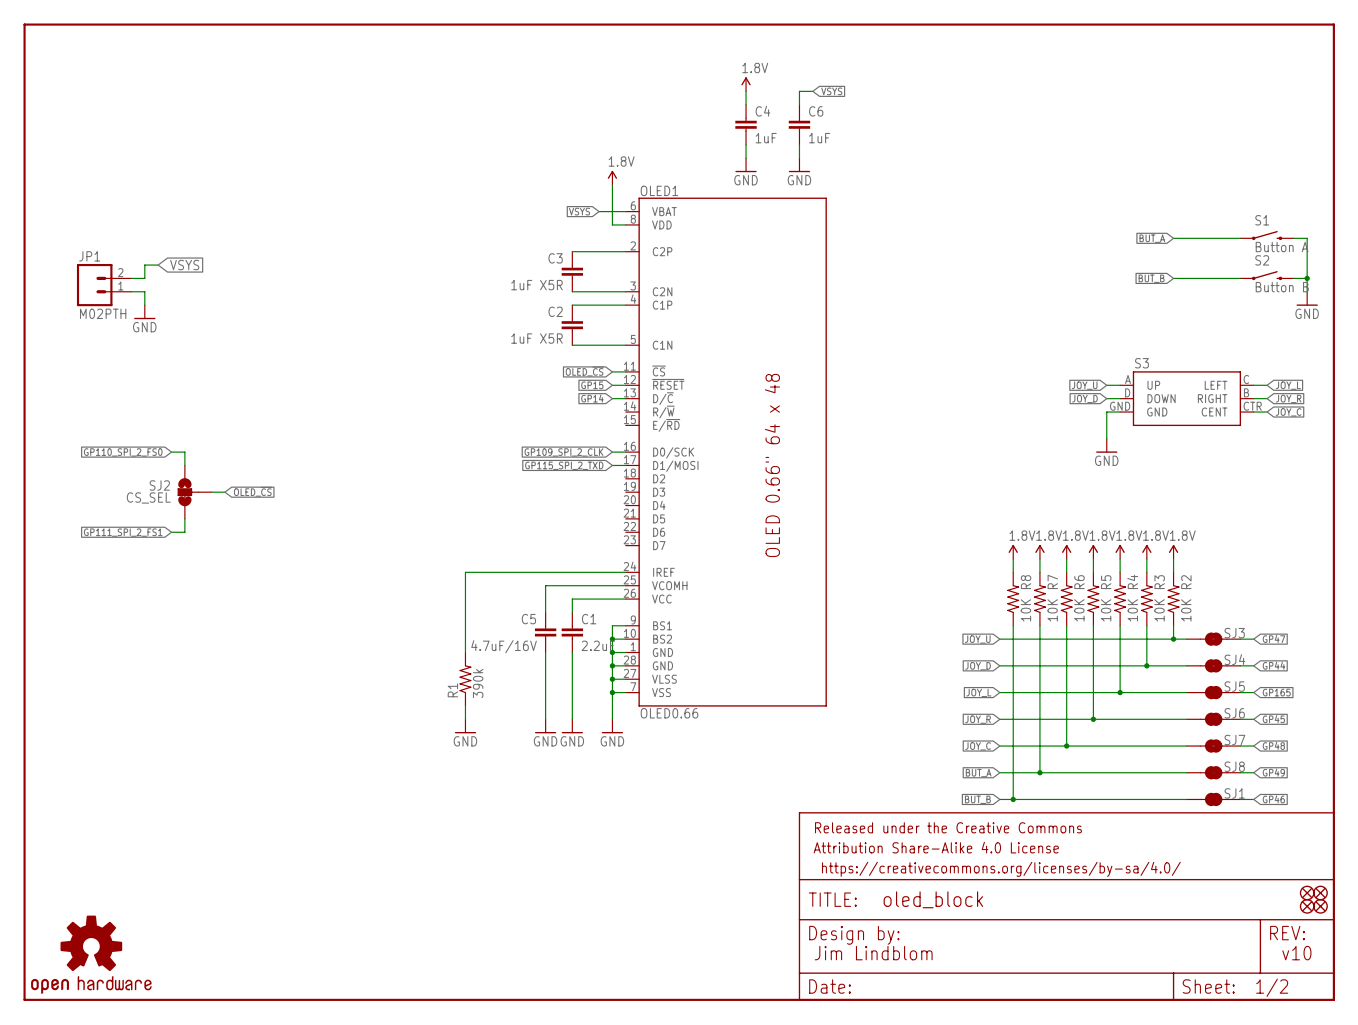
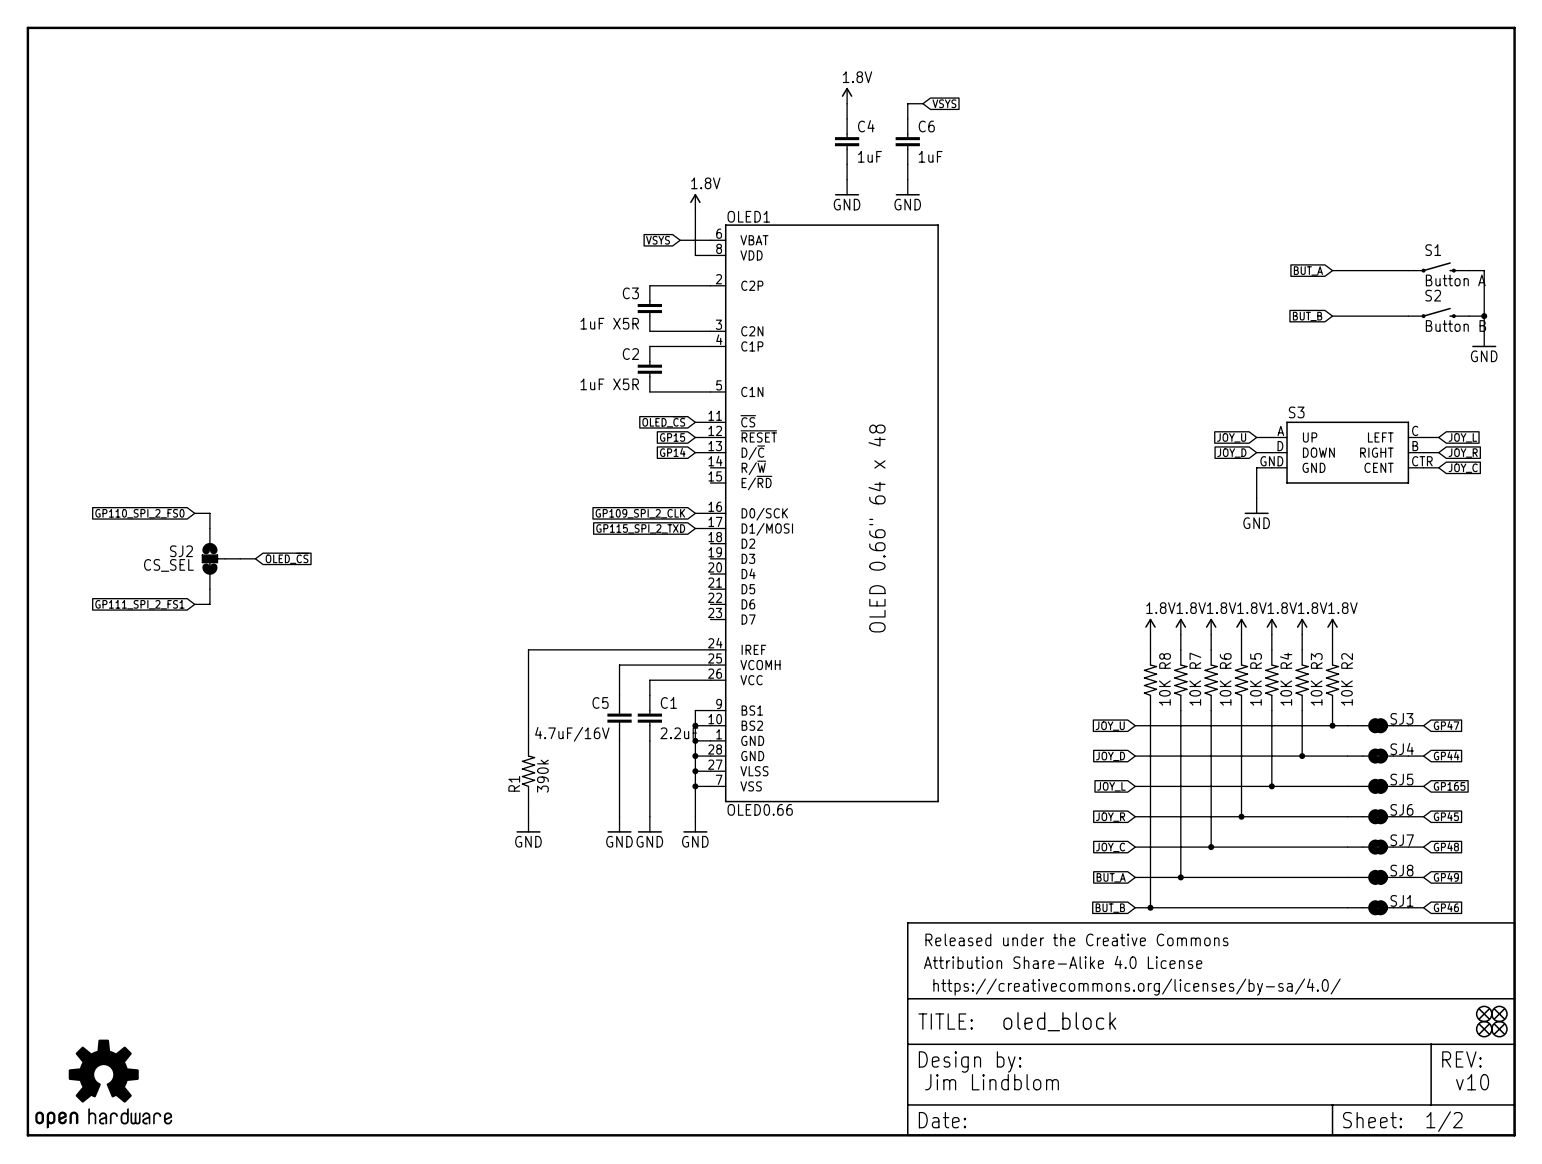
wire: (158, 265) (144, 265) (144, 278) (131, 278) -> none
global label: VSYS (184, 265) -> none
JP1: M02PTH (104, 285) -> none
wire: (131, 291) (144, 291) (144, 305) -> none
power symbol: GND (144, 312) -> none

